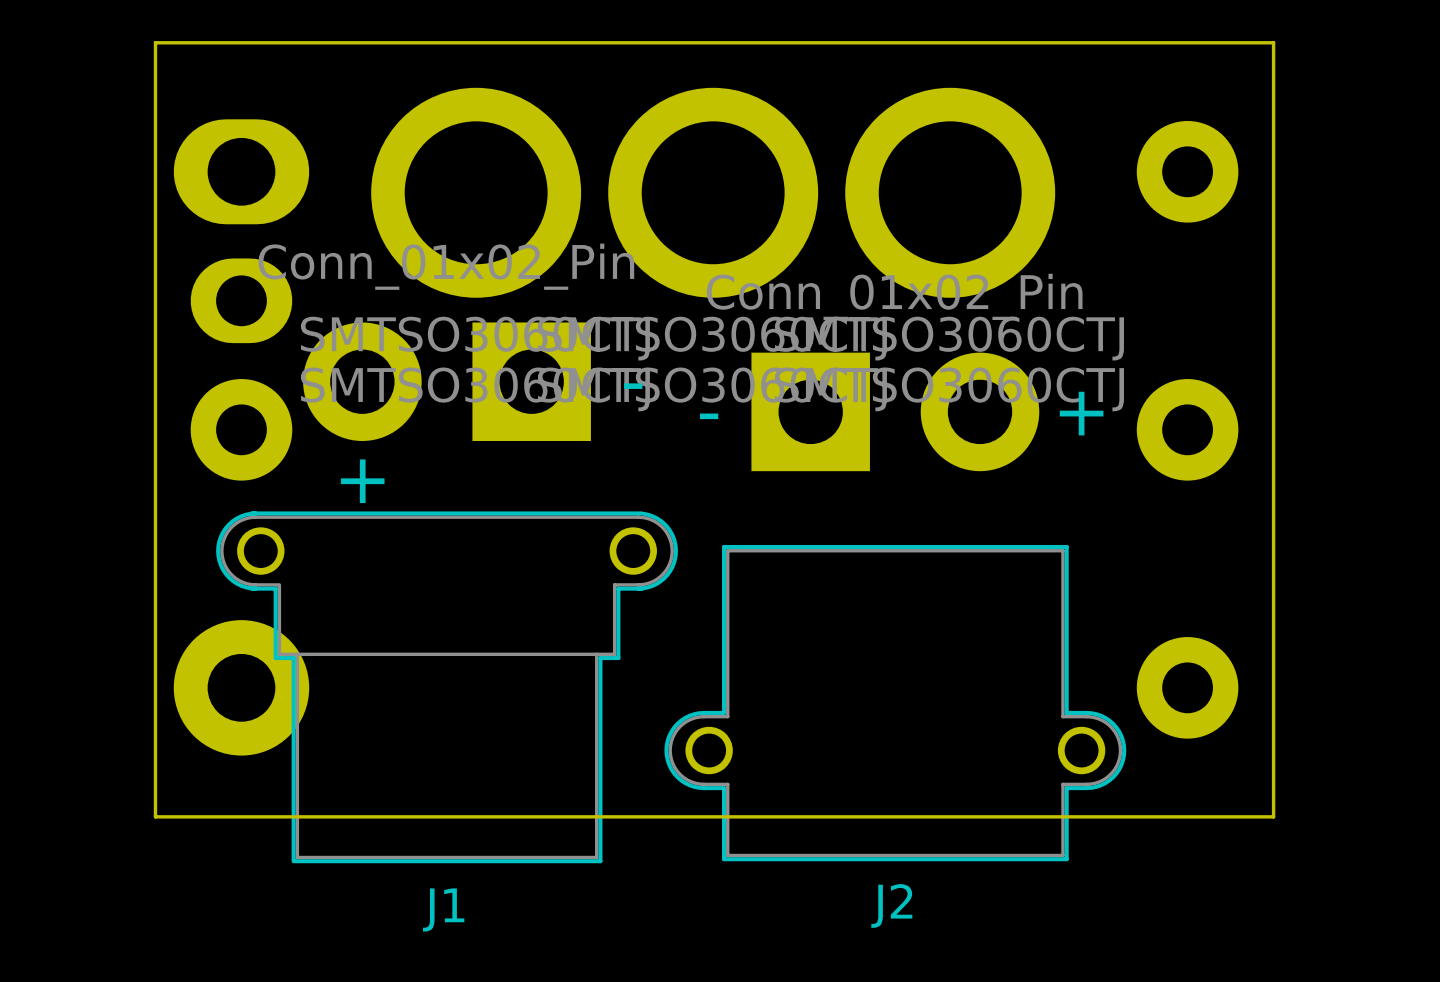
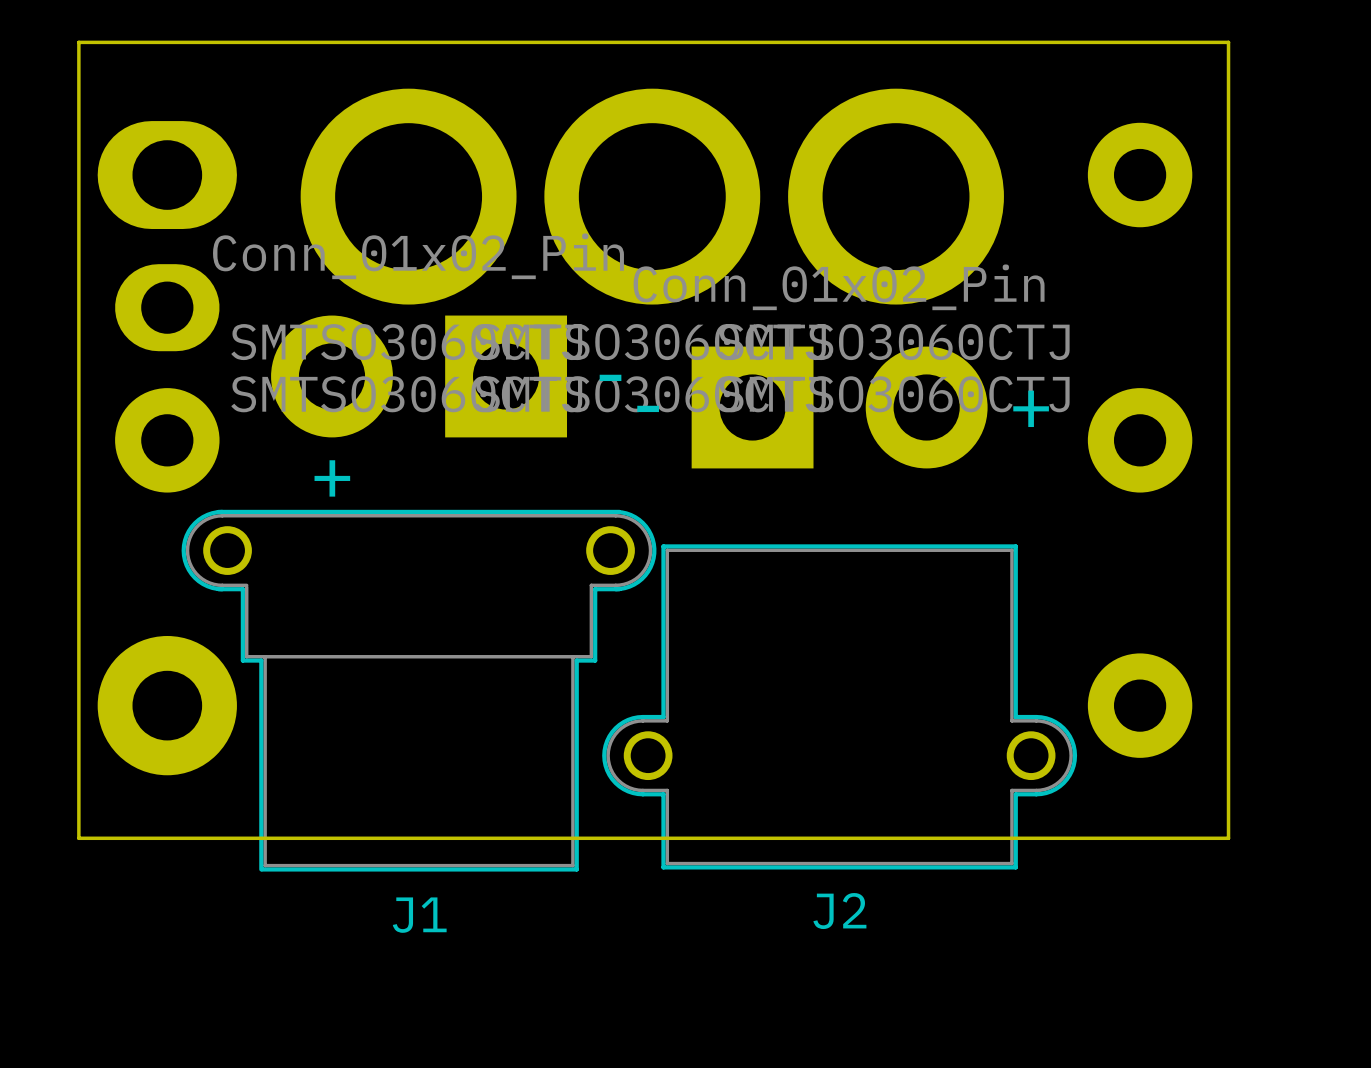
J1 position: (447, 592) -> (419, 593)
J2 position: (895, 606) -> (839, 608)

